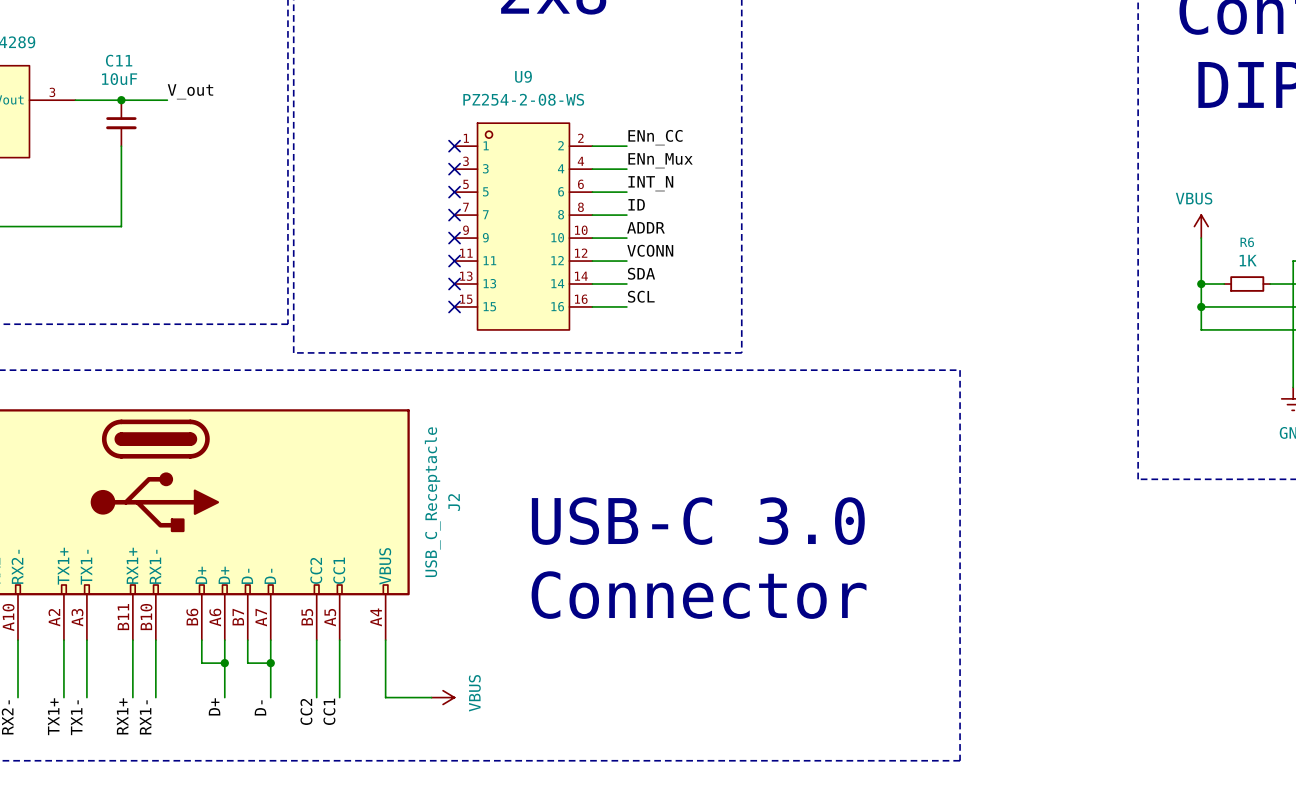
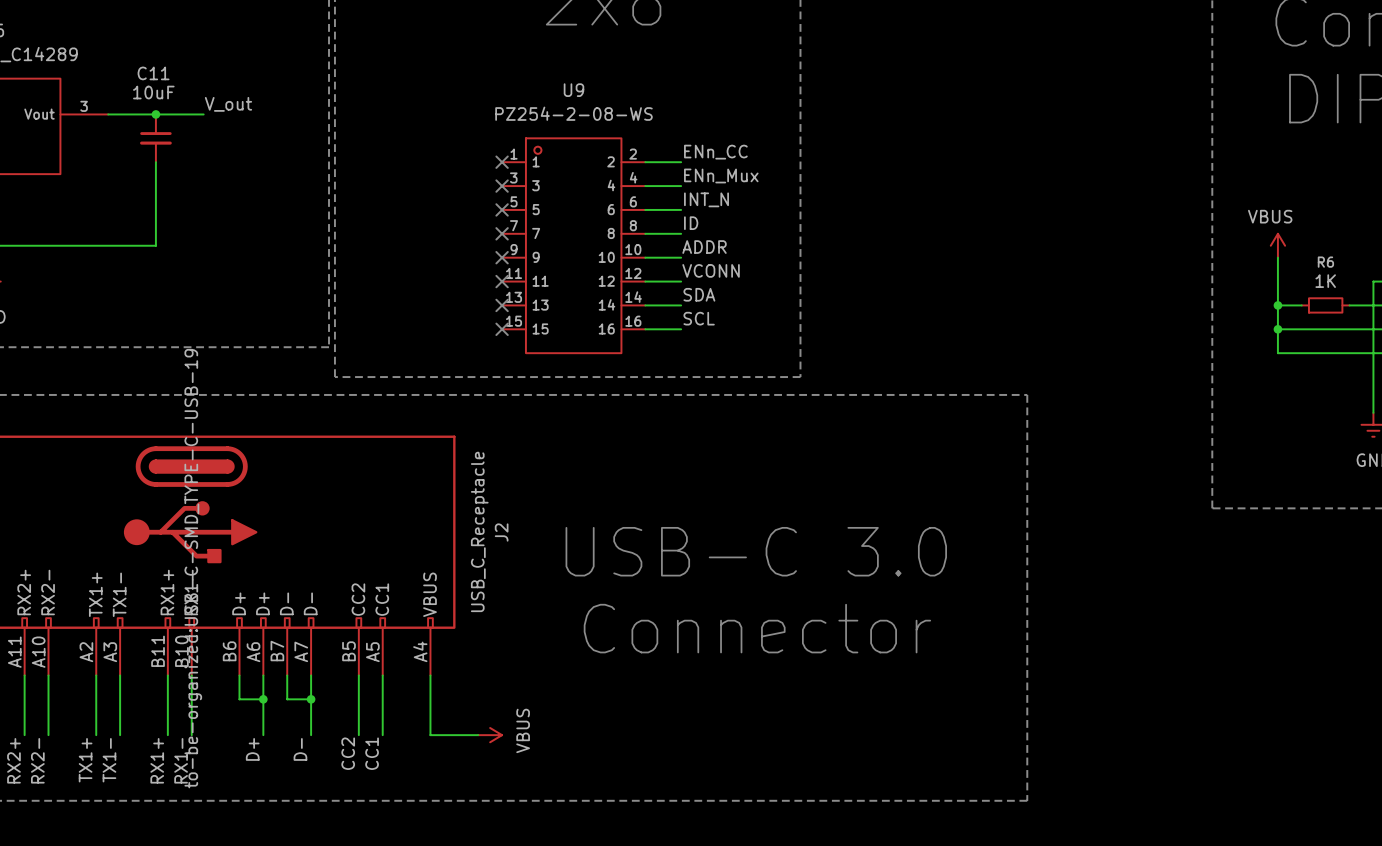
J2 text: none -> to-be-organized:USB-C-SMD_TYPE-C-USB-19 (193, 568)

